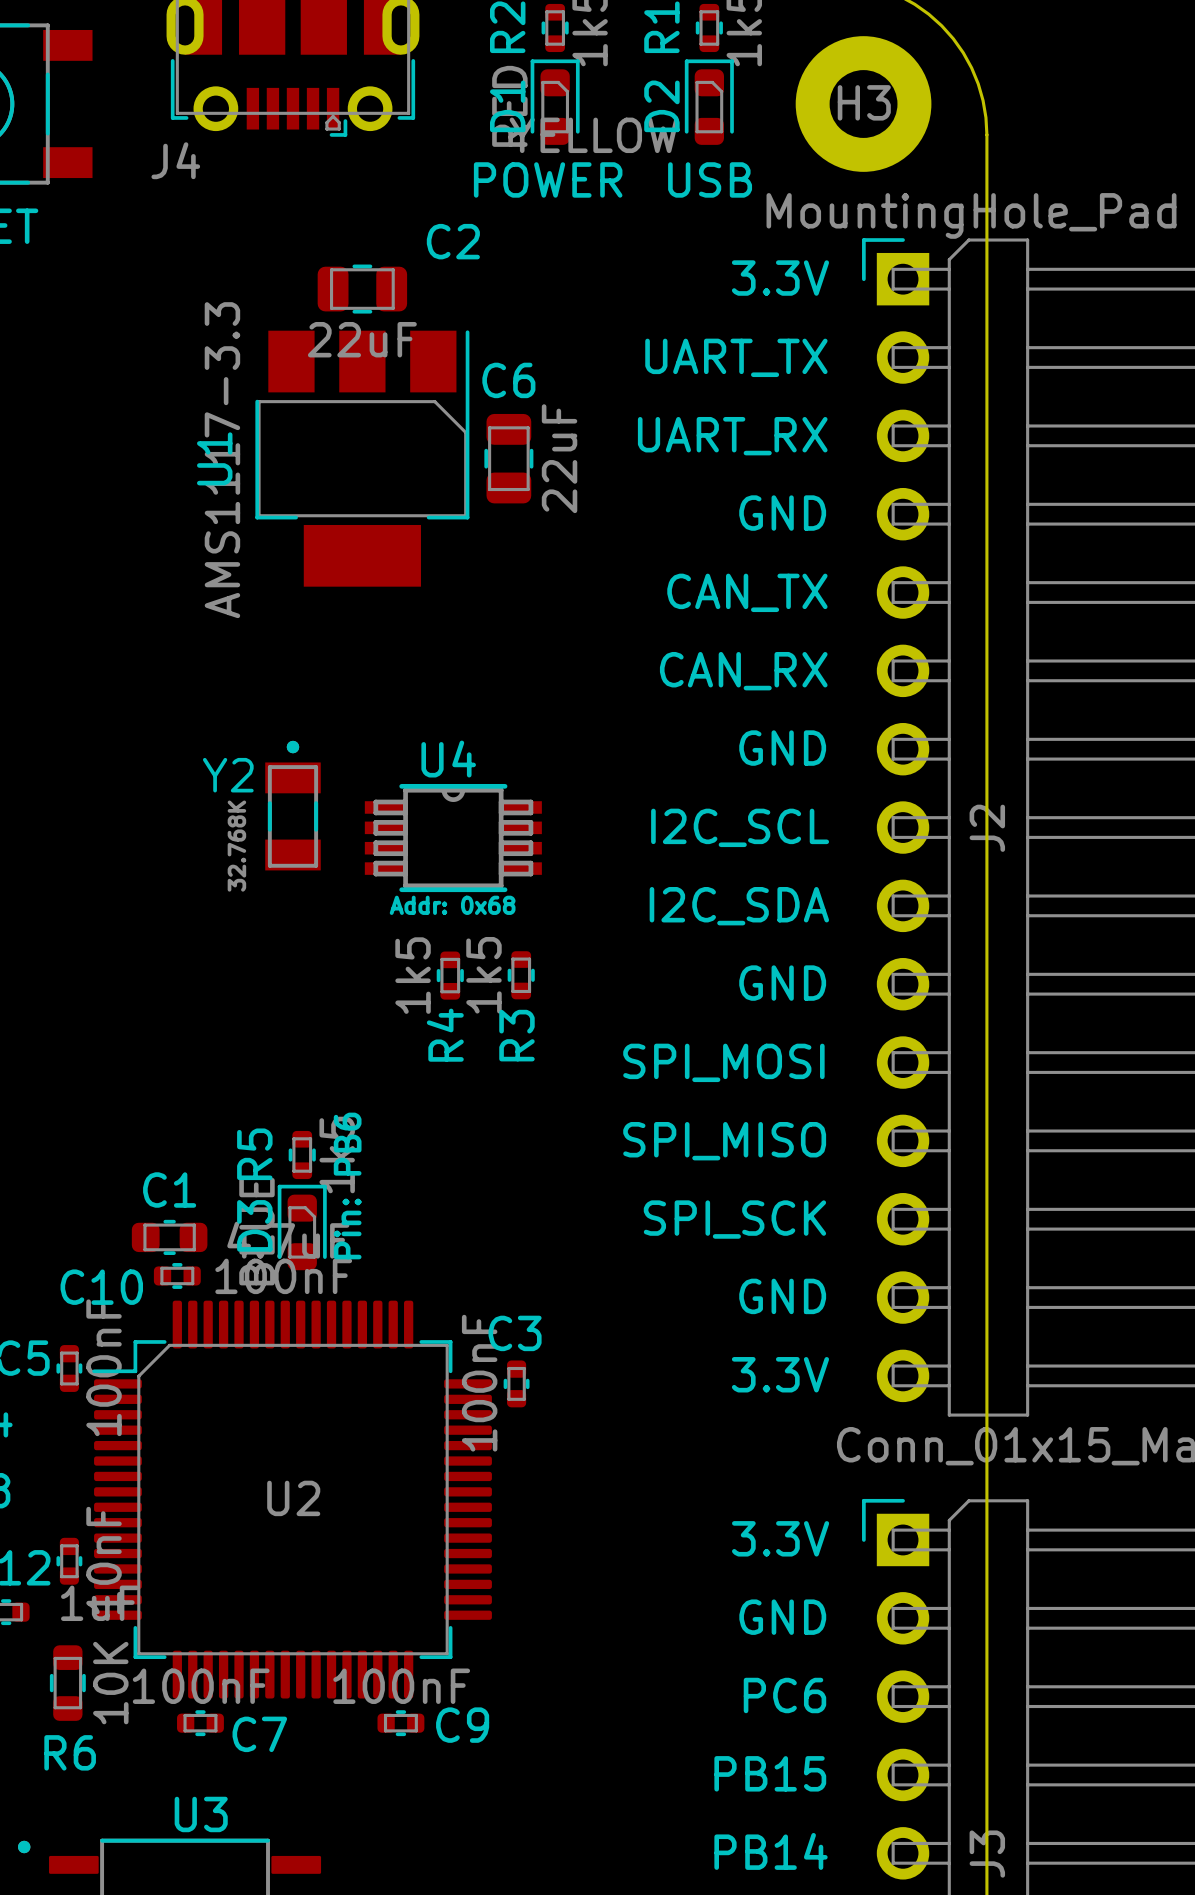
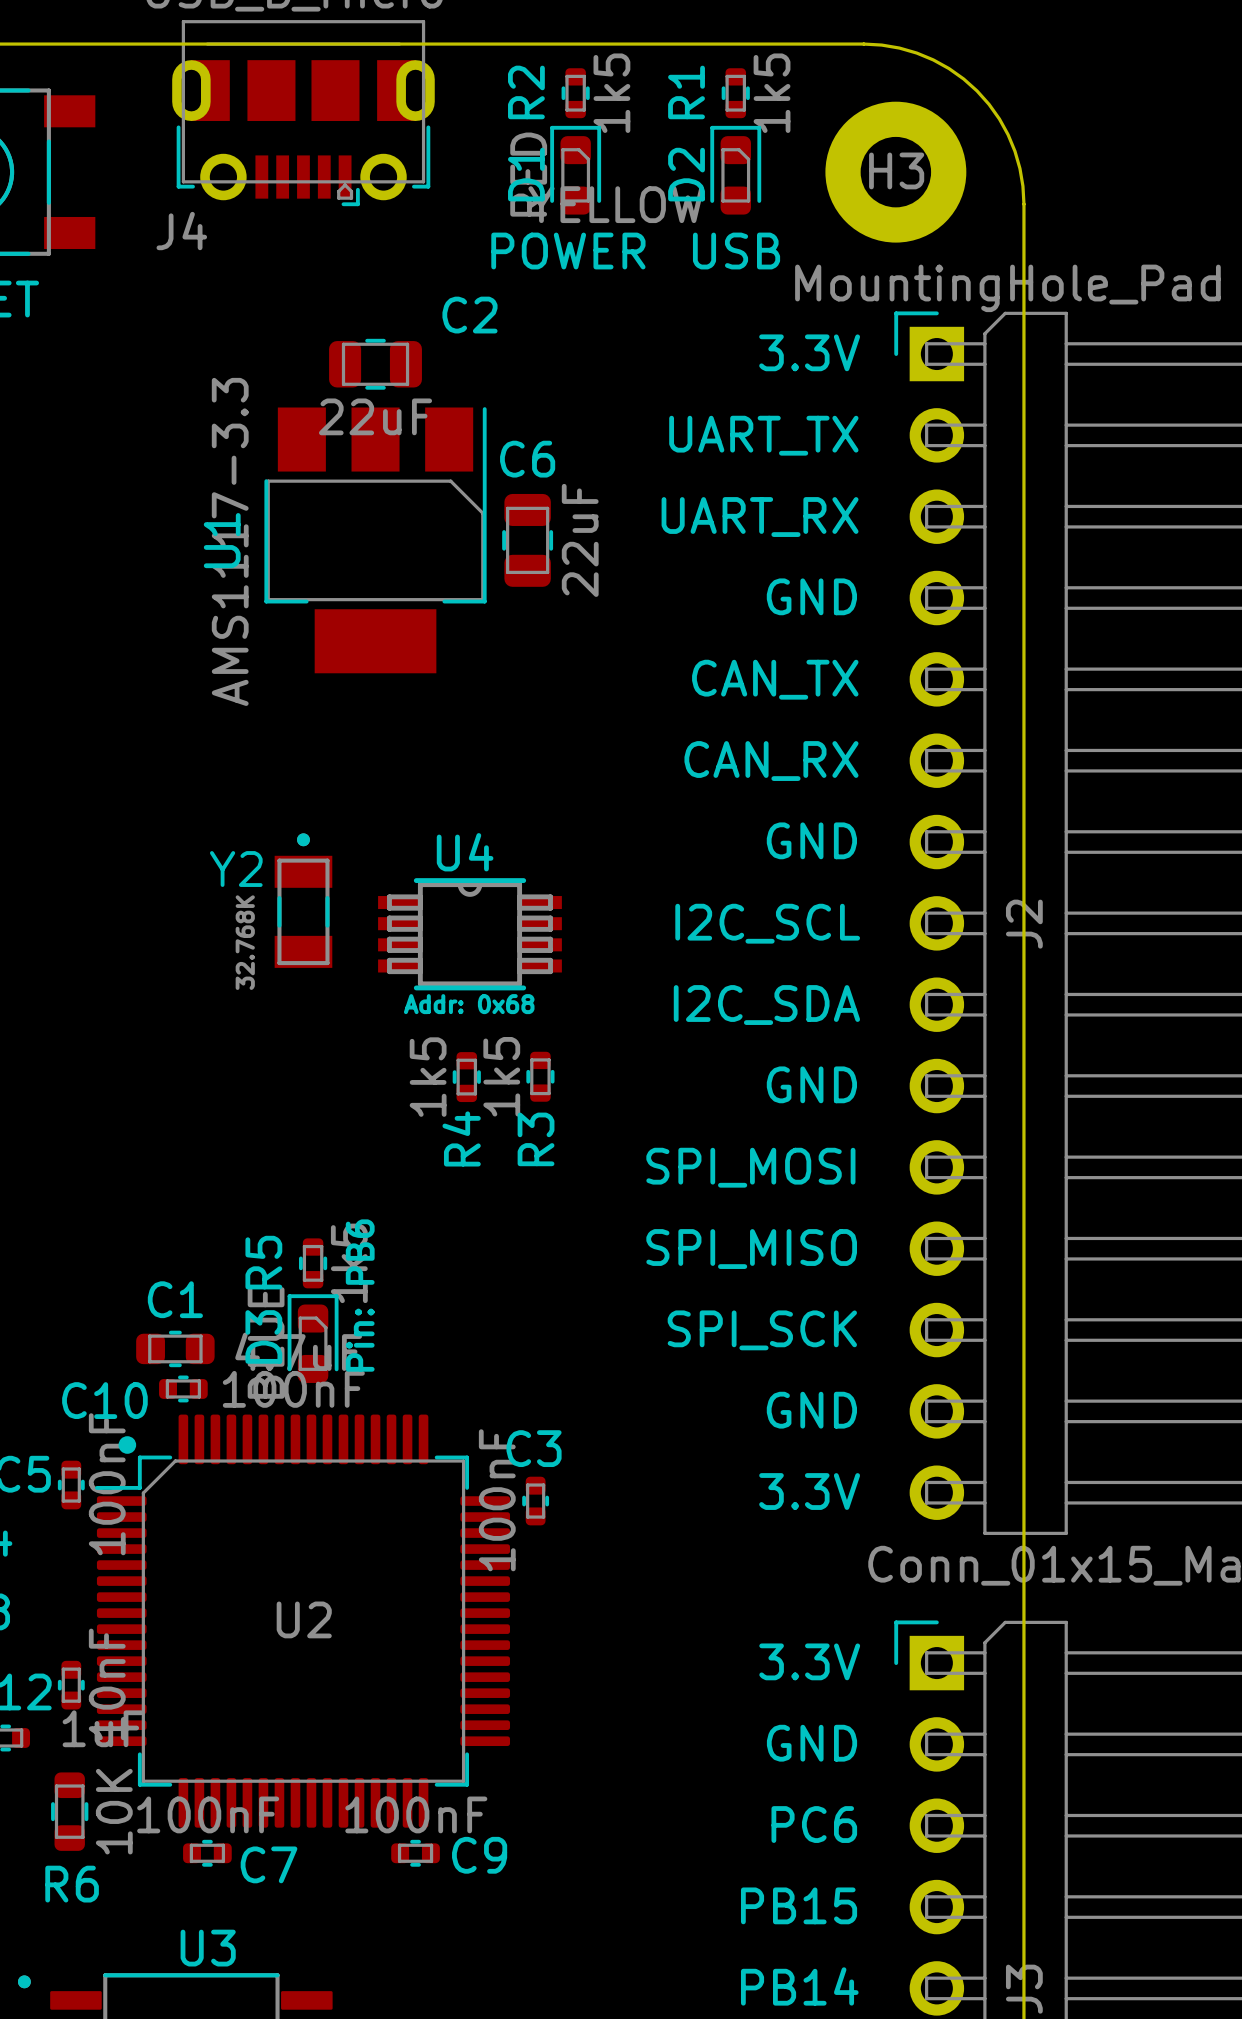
drawing: none -> [118, 1436, 137, 1454]

